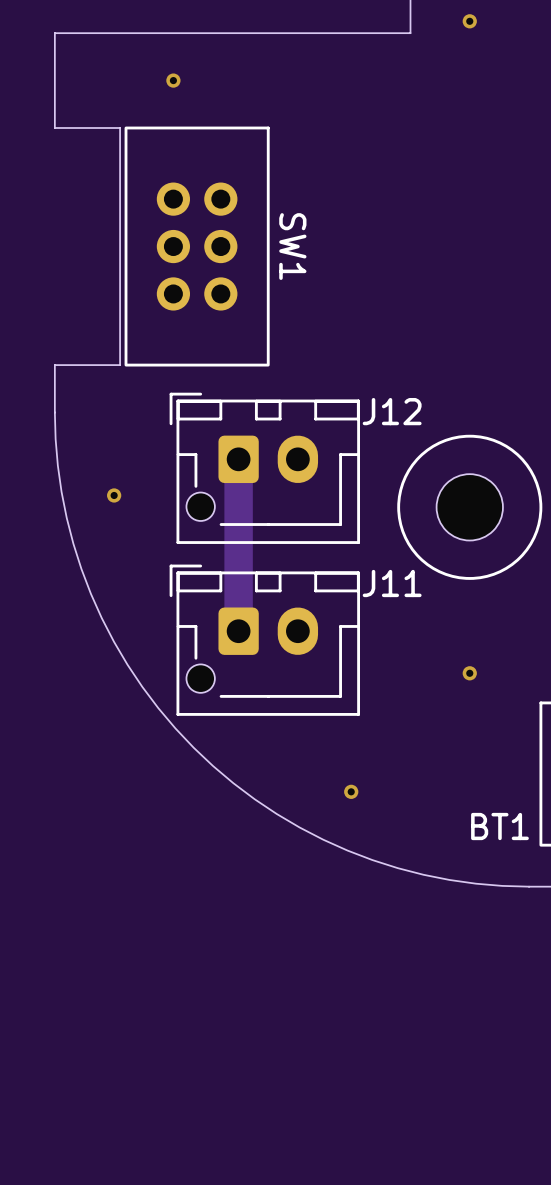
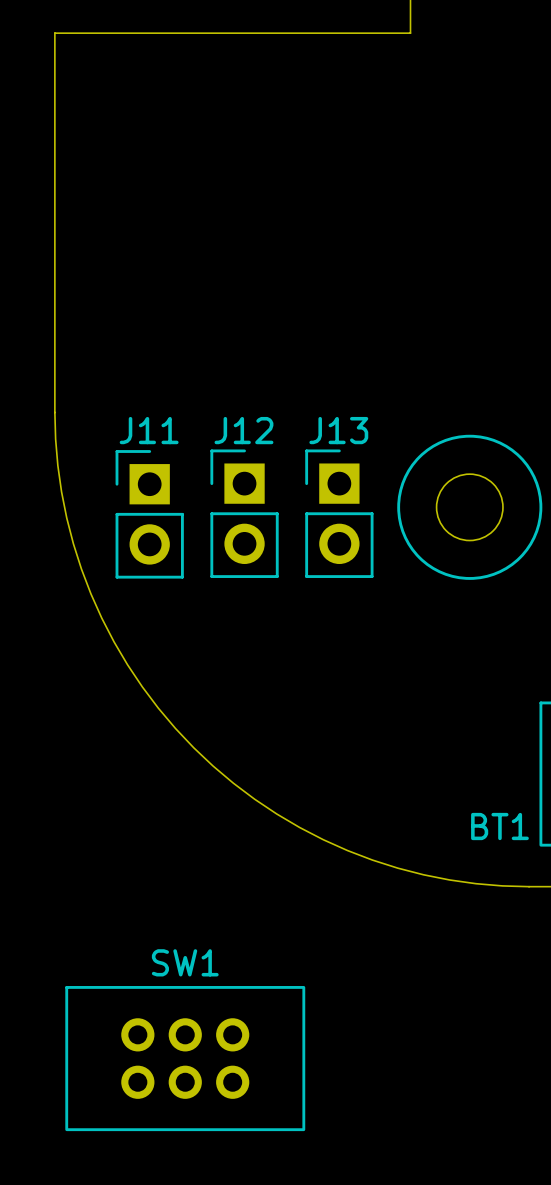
via: (469, 21) -> none
via: (173, 80) -> none
board edge: (54, 128) (120, 128) (120, 365) (54, 365) -> (54, 128) (54, 365)
SW1 rotation: 0° (197, 246) -> 90° clockwise (185, 1058)
SW1 position: (197, 246) -> (185, 1058)
SW1 name position: SW1 (292, 246) -> SW1 (185, 962)
J12 footprint: [169, 392, 361, 544] -> [210, 449, 279, 578]
J12 name position: J12 (392, 411) -> J12 (243, 430)
track: (238, 459) (238, 631) -> none
via: (114, 495) -> none
J13: none -> (339, 513)
J11 footprint: [169, 564, 361, 716] -> [115, 450, 184, 579]
J11 name position: J11 (392, 583) -> J11 (149, 430)
via: (469, 673) -> none
via: (351, 791) -> none

